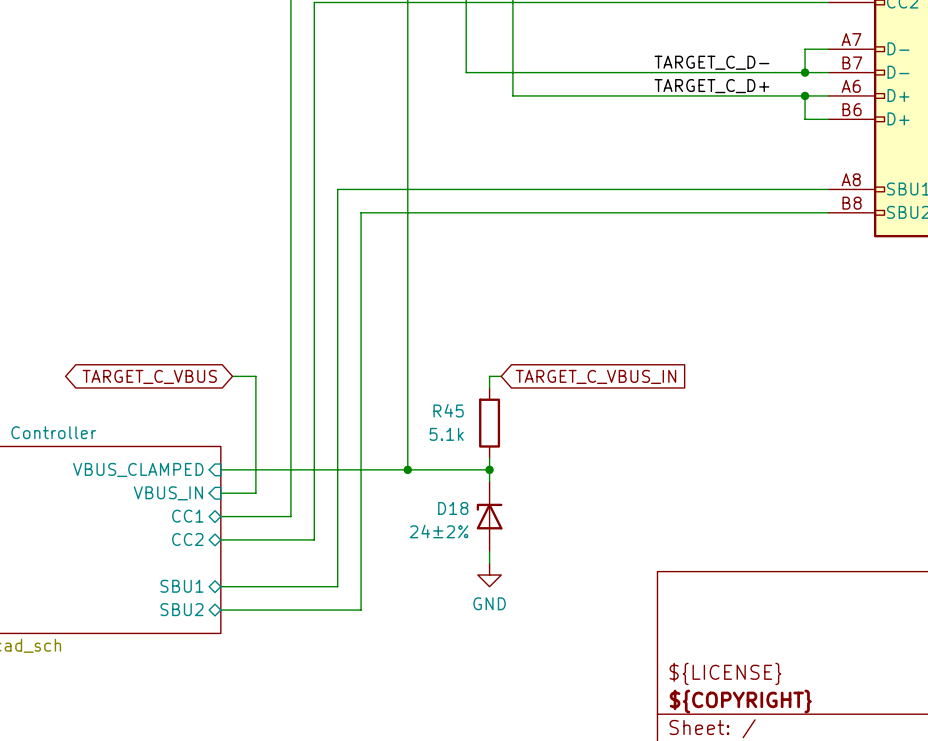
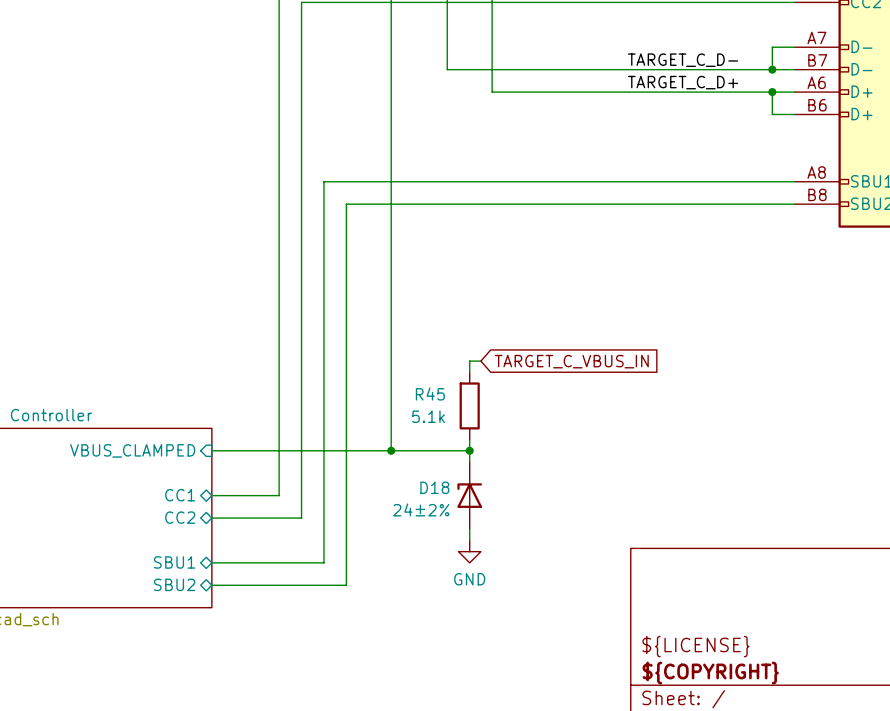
global label: TARGET_C_VBUS (149, 376) -> none
wire: (232, 376) (255, 376) (255, 493) (220, 493) -> none
sheet pin: VBUS_IN (168, 493) -> none

